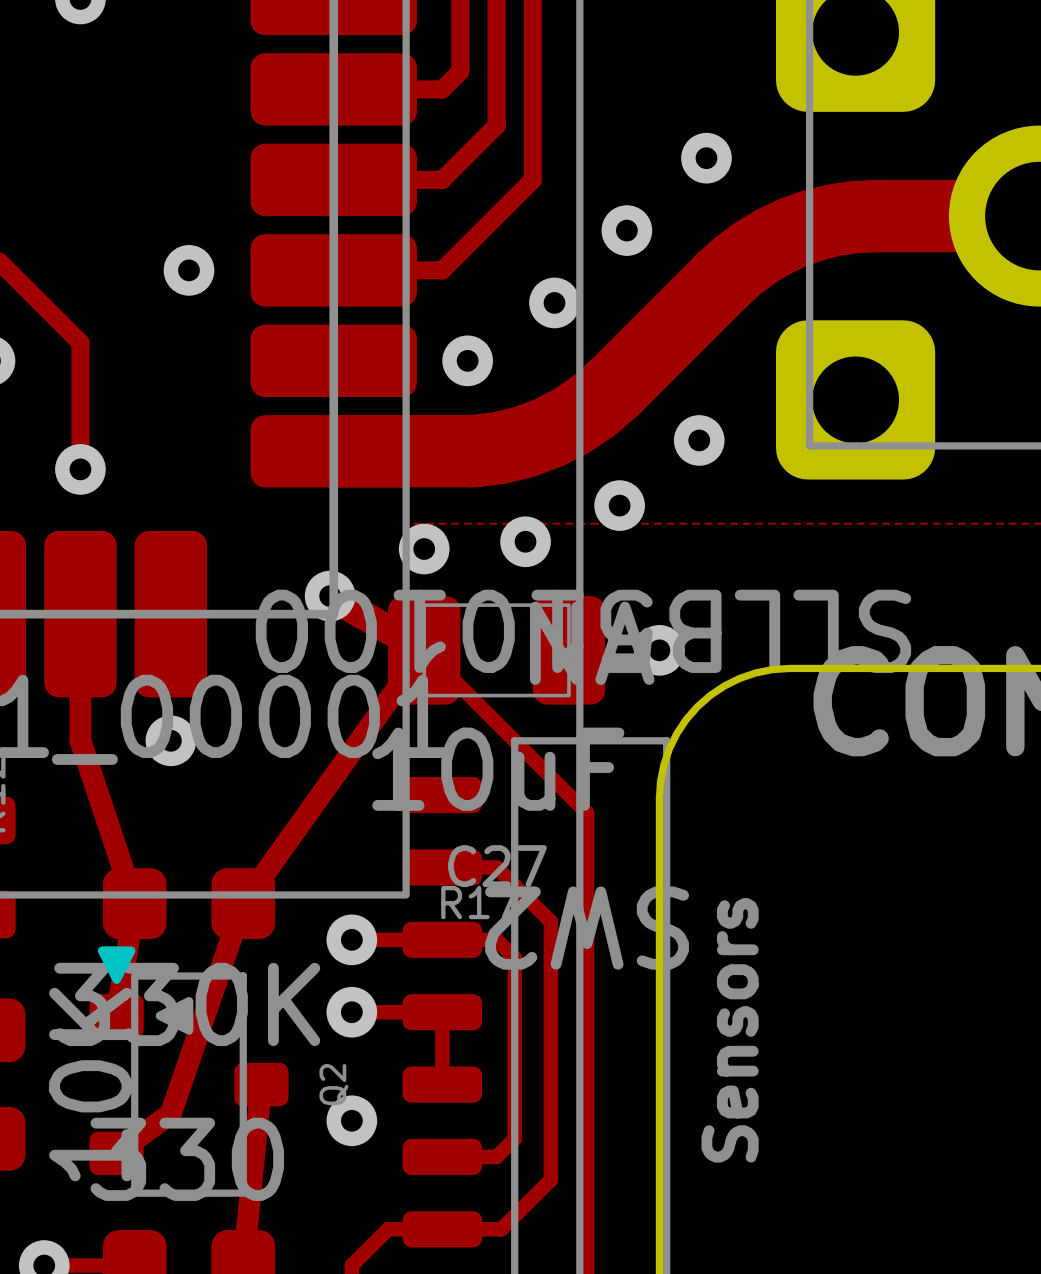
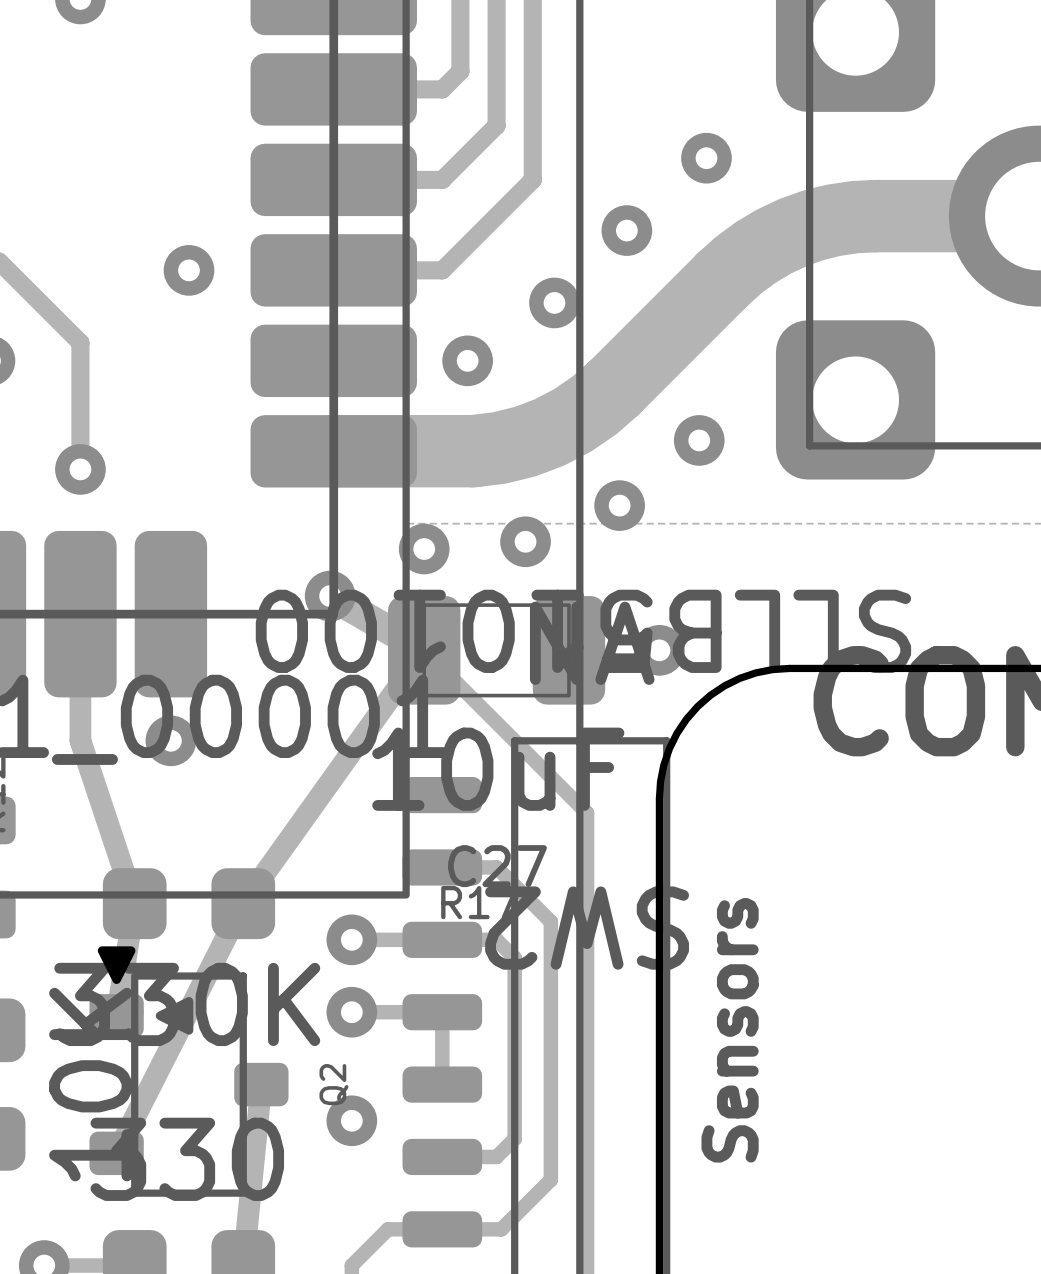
track: (243, 903) (170, 1113) (116, 1153) -> (243, 903) (116, 1153)

